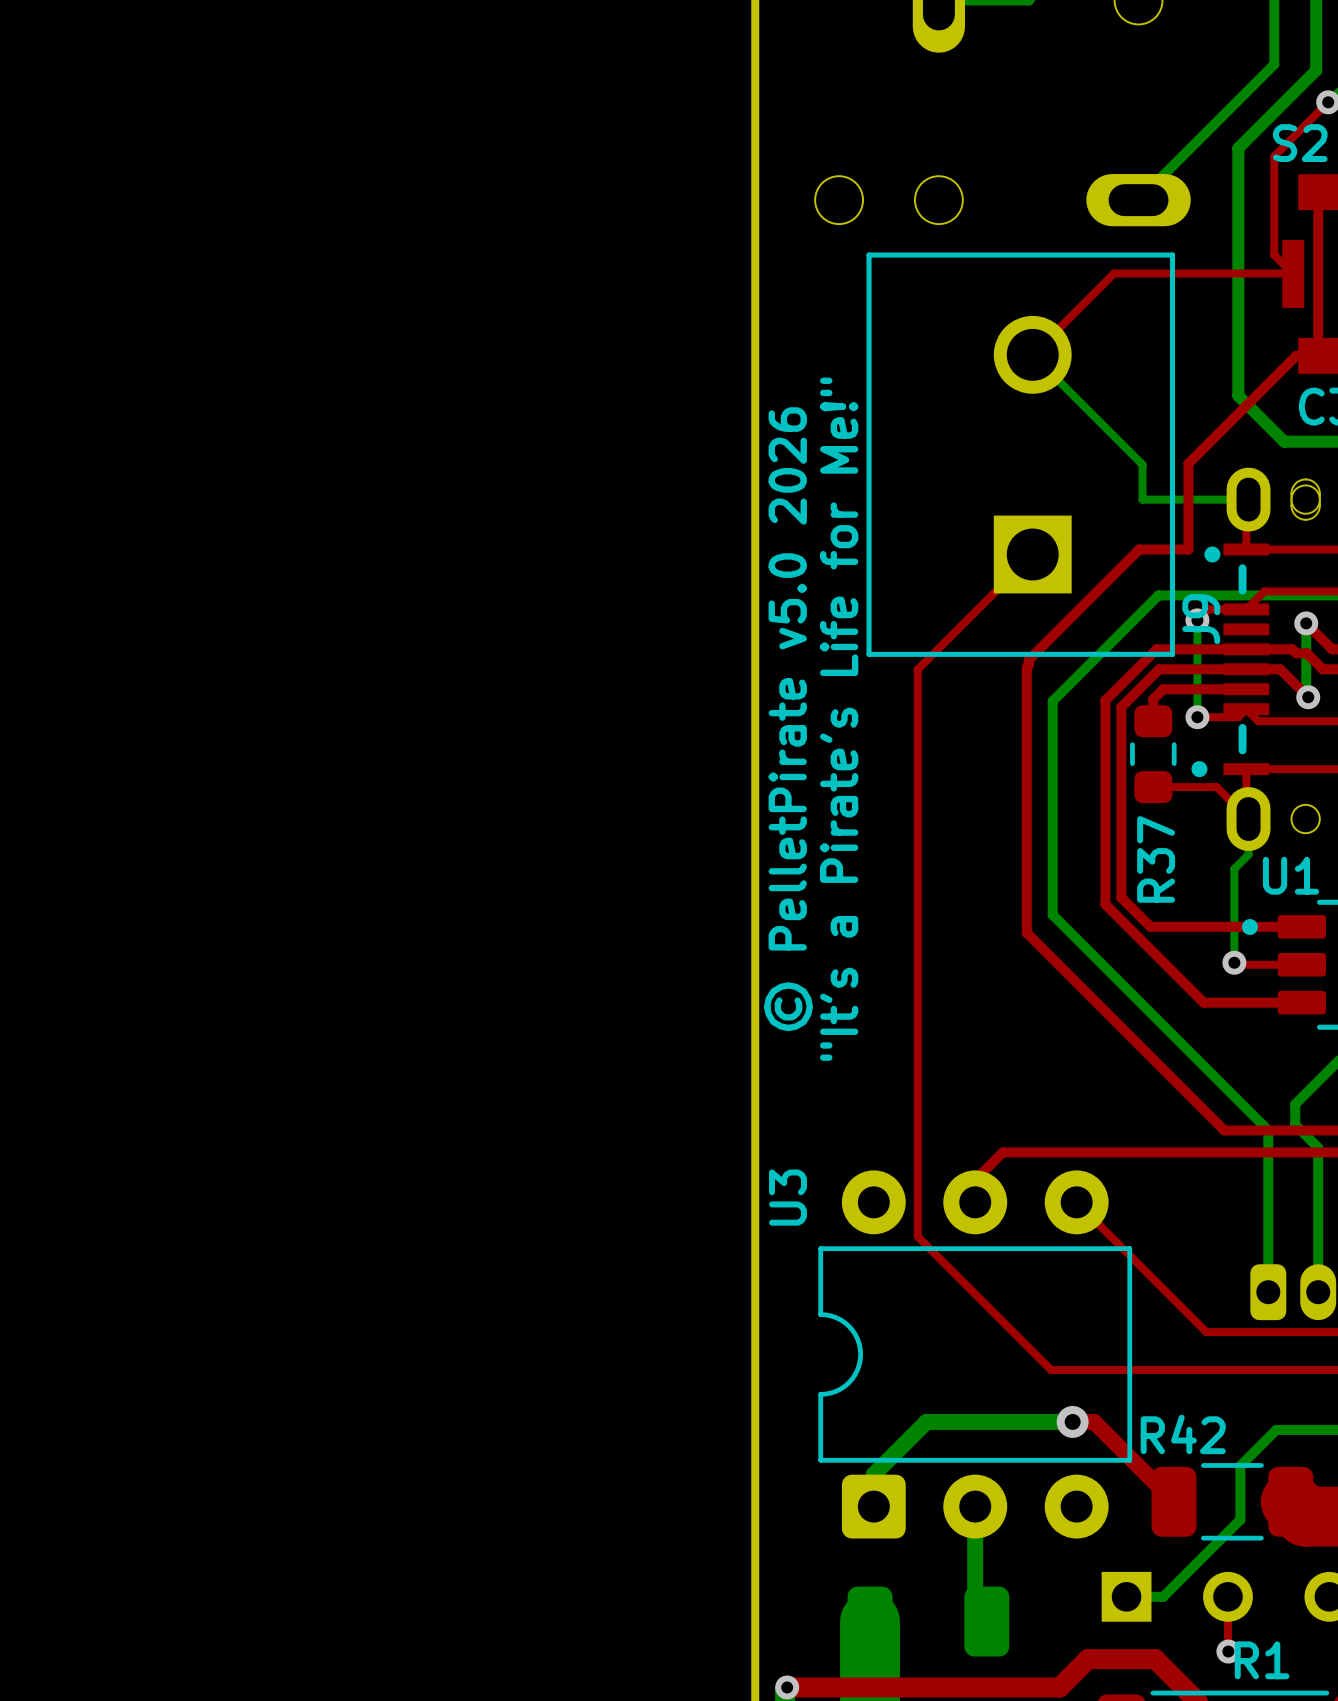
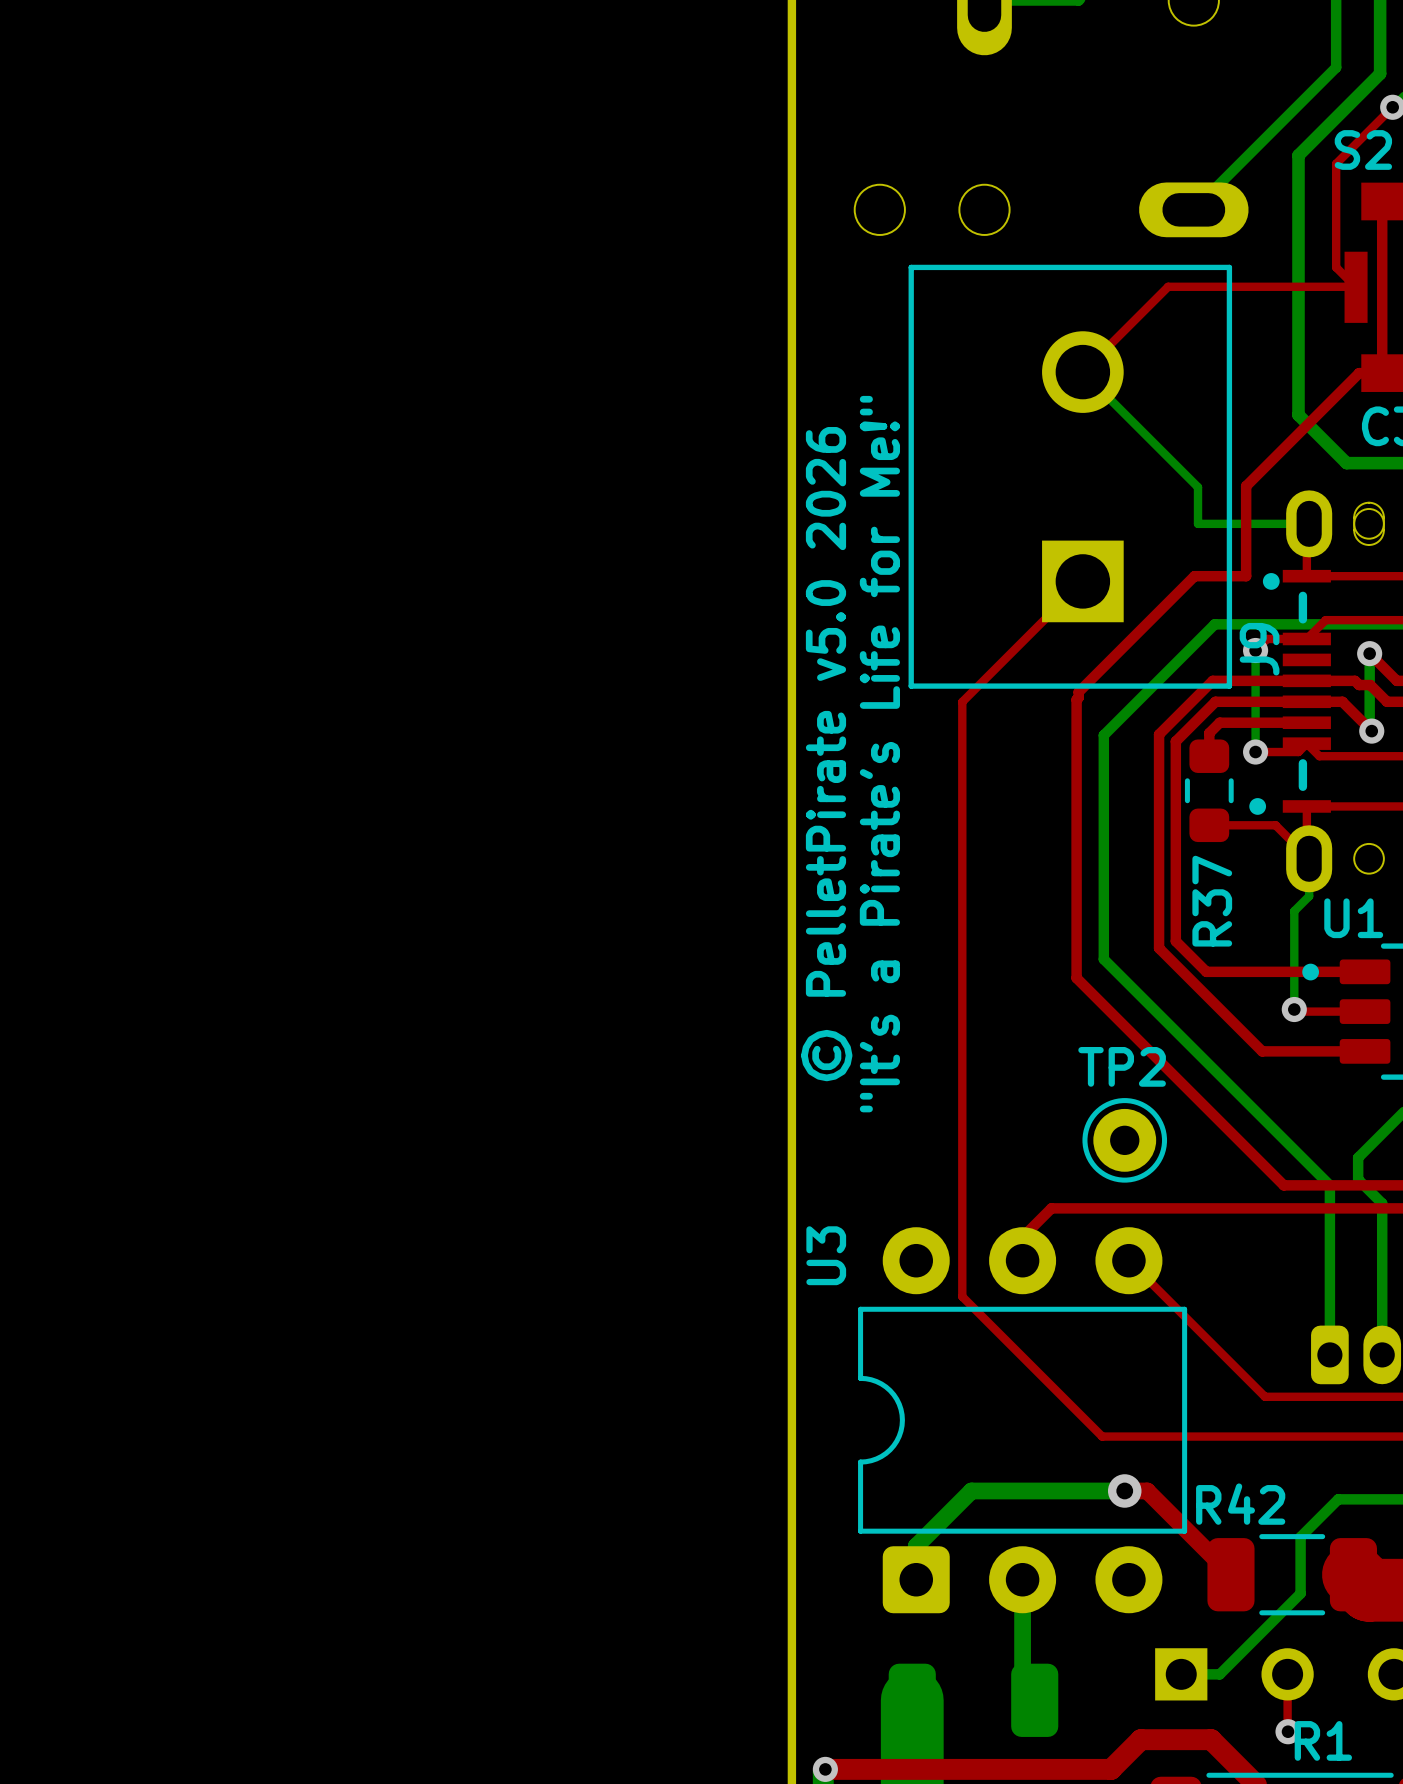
TP2: none -> (1124, 1140)

